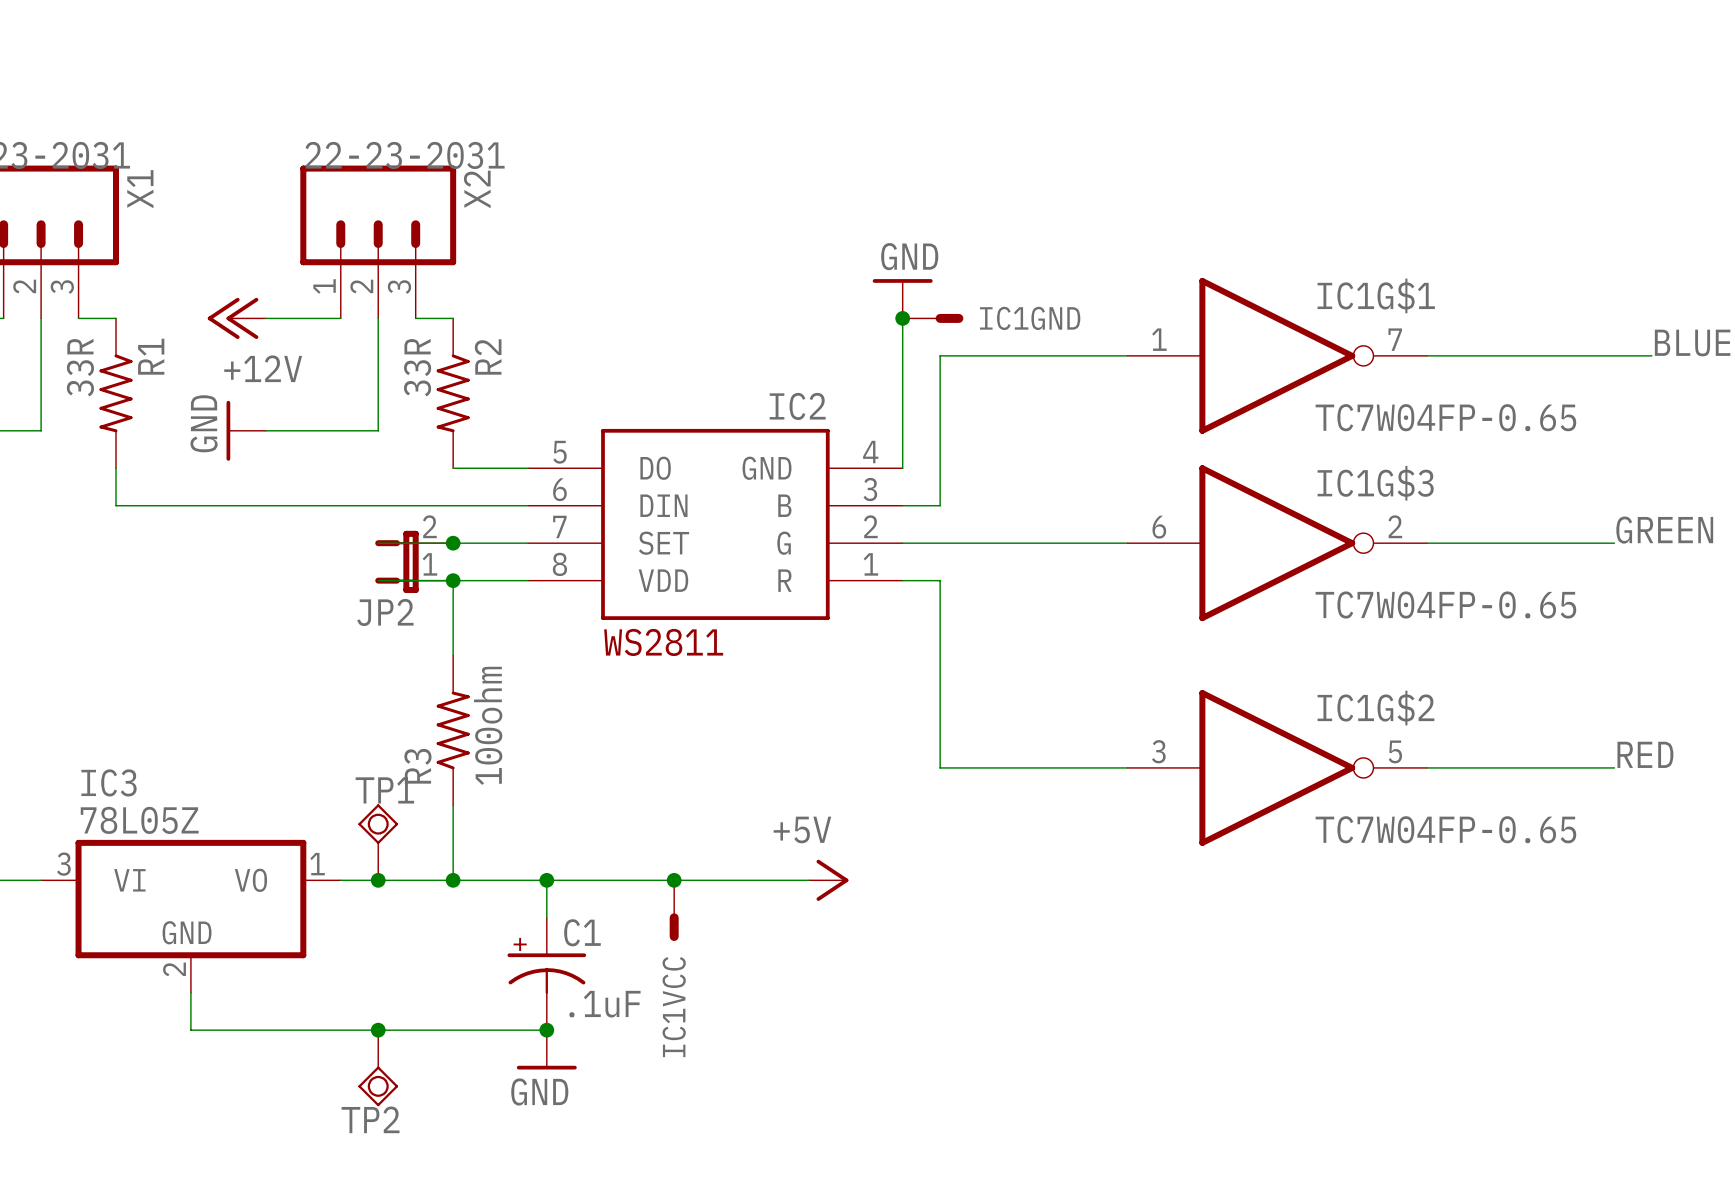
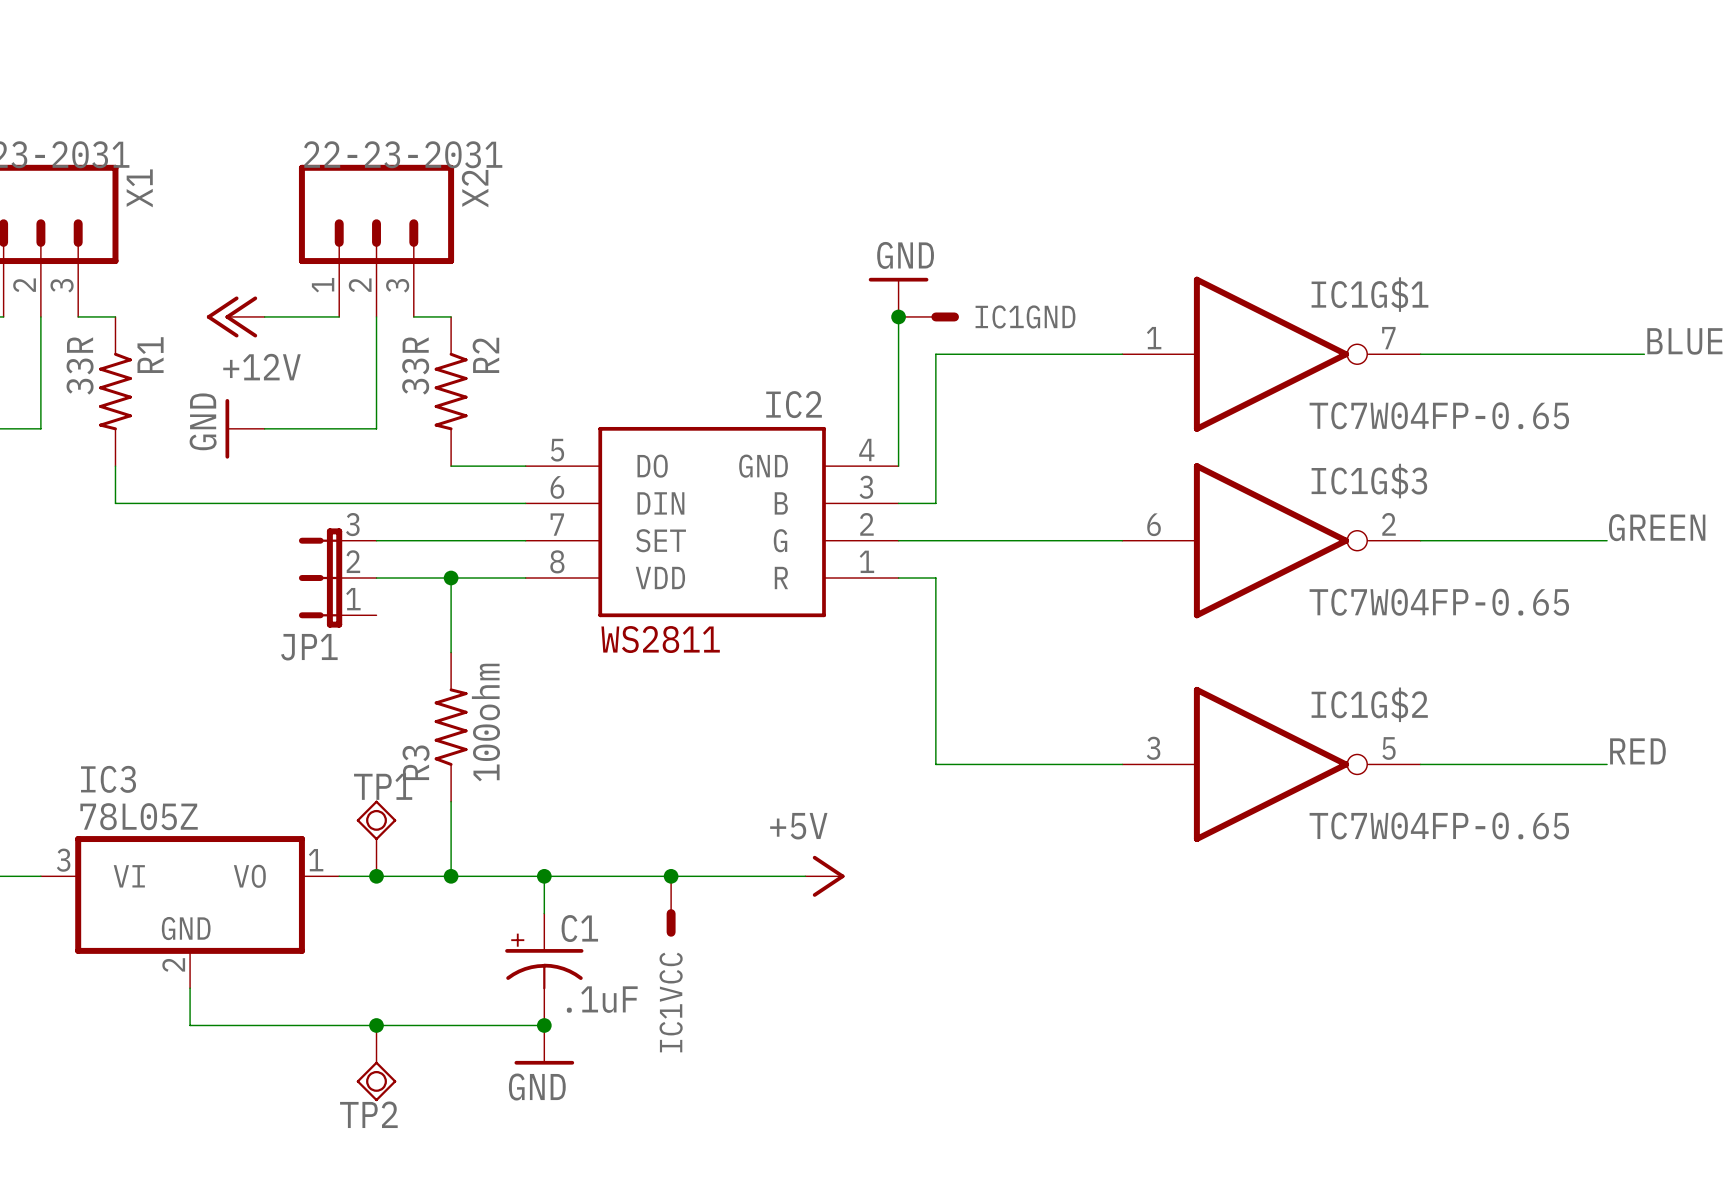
junction: (453, 543) -> none
JP2: (414, 561) -> none
JP1: none -> (337, 578)

